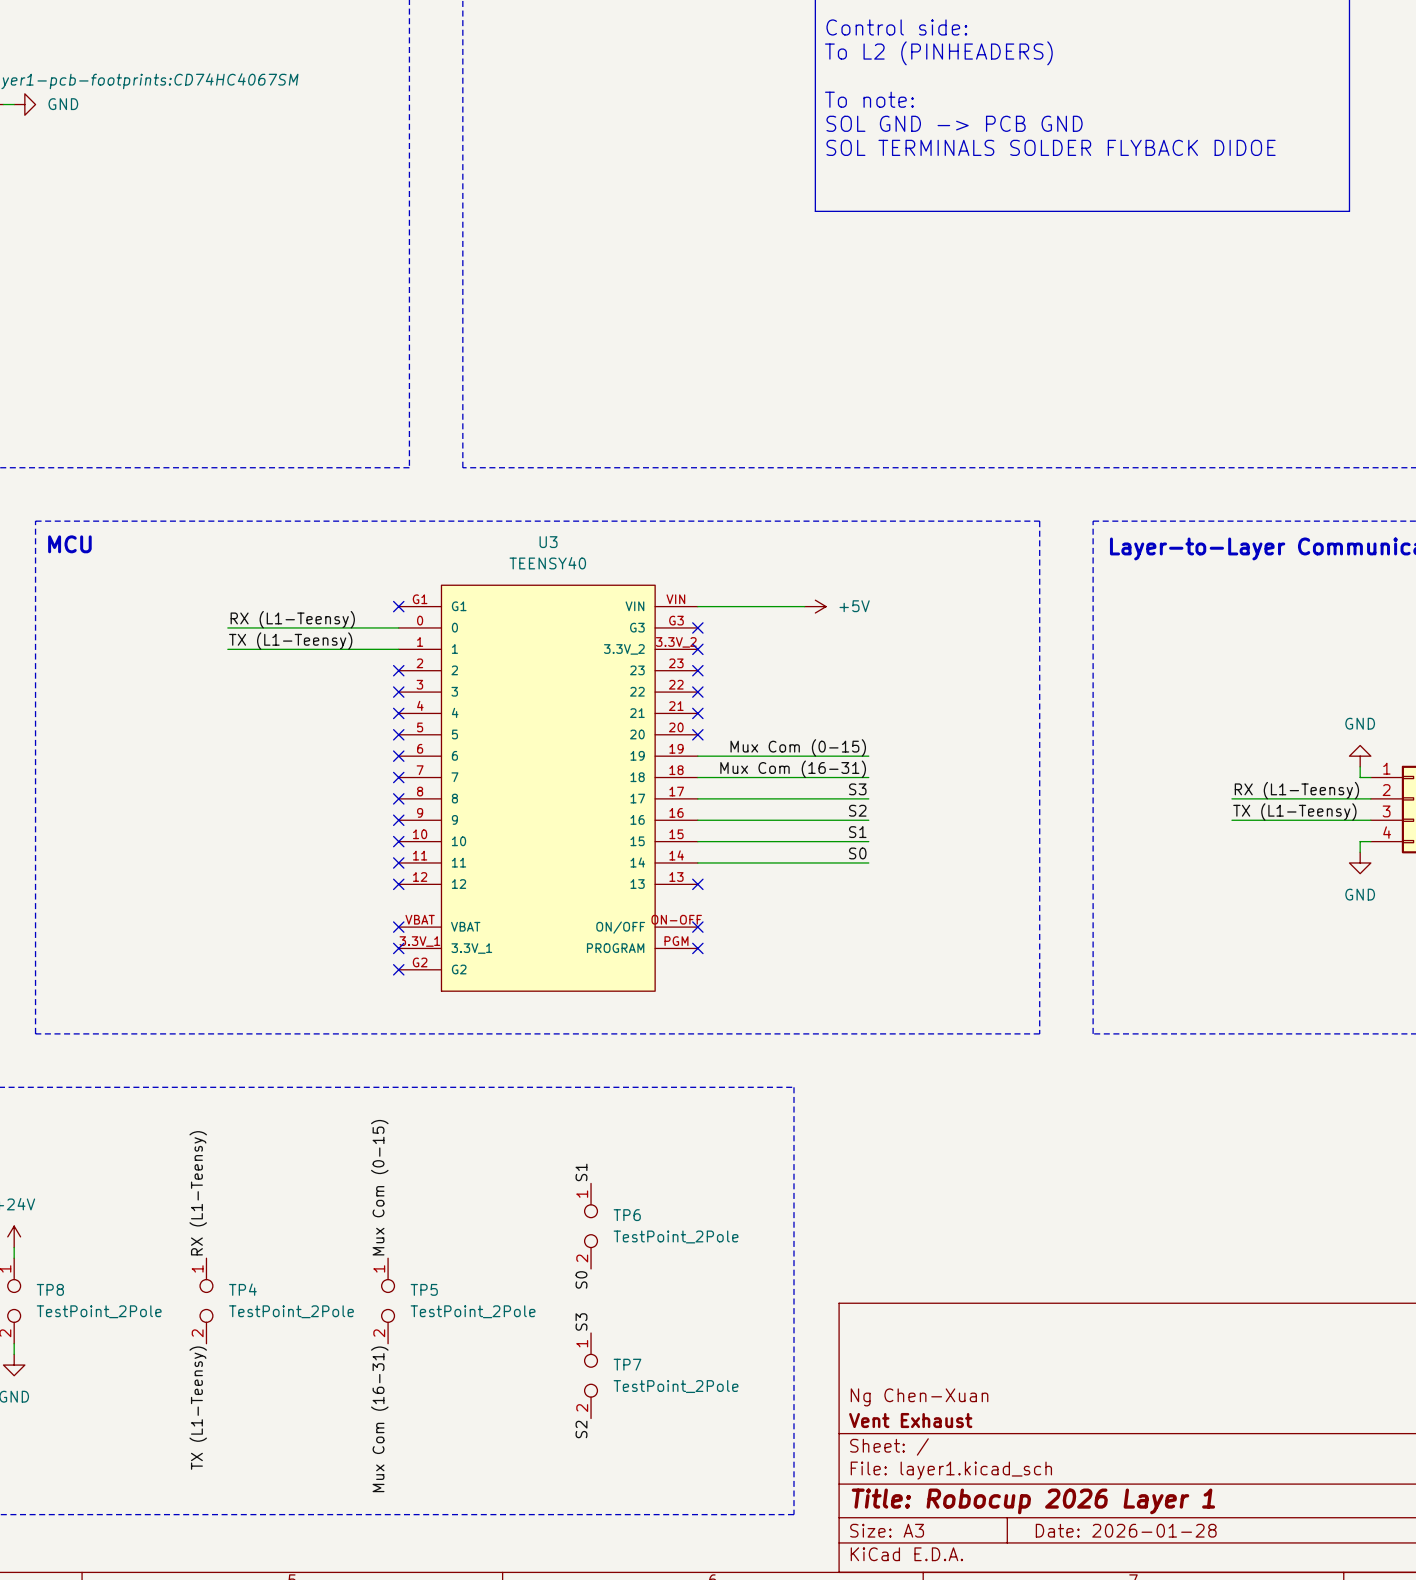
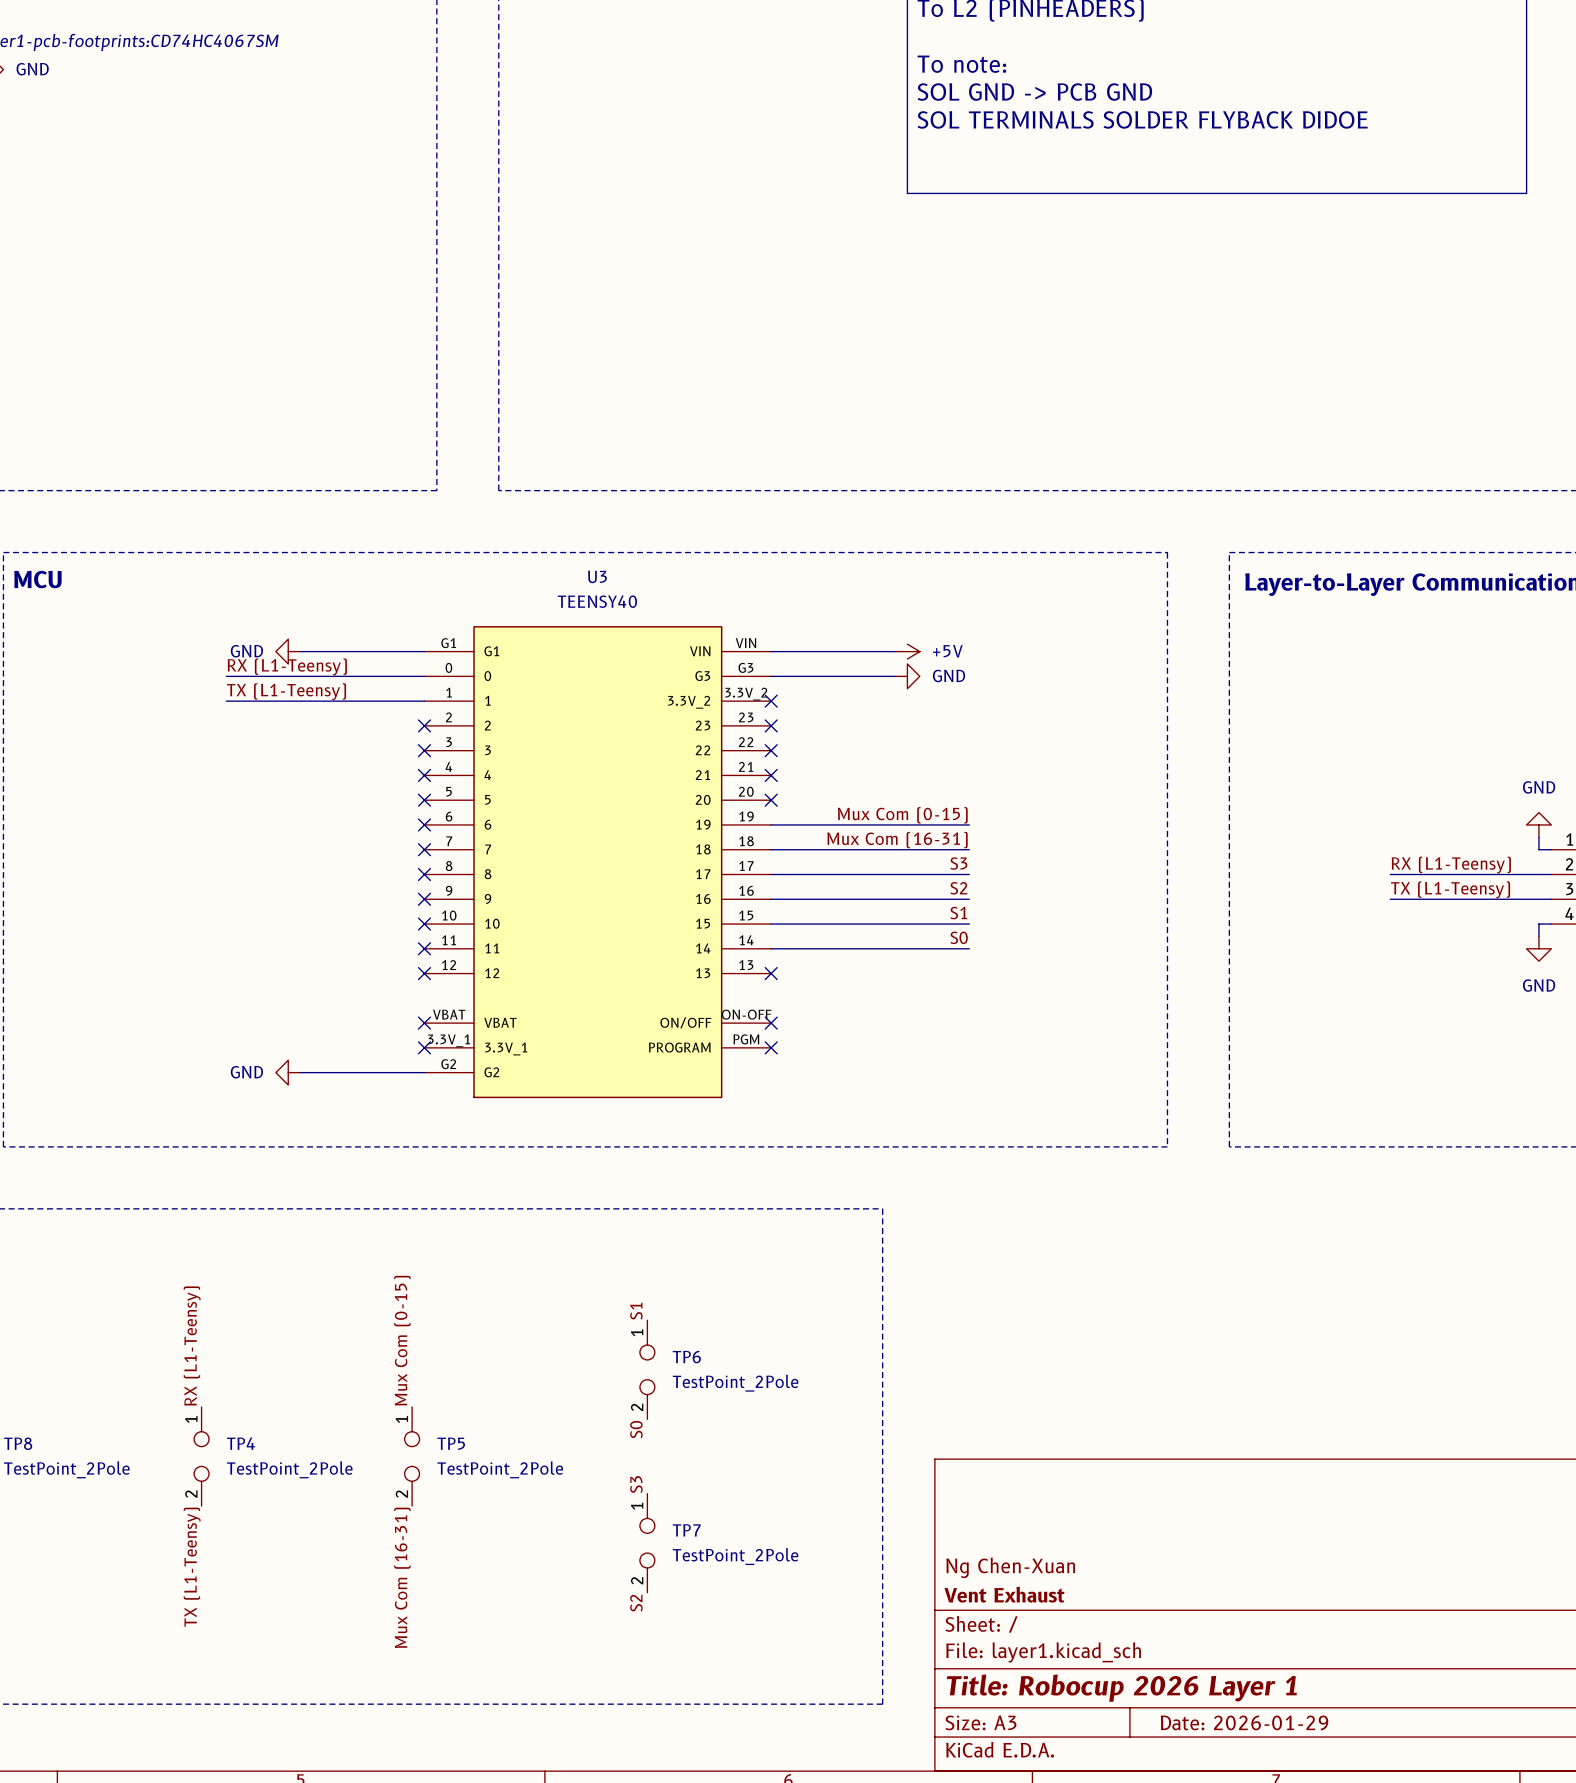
power symbol: none -> GND (288, 651)
wire: none -> (300, 651) (424, 651)
no-connect mark: (398, 606) -> none
wire: none -> (771, 676) (895, 676)
no-connect mark: (697, 627) -> none
power symbol: none -> GND (907, 676)
power symbol: none -> GND (288, 1072)
wire: none -> (300, 1072) (424, 1072)
no-connect mark: (398, 969) -> none
title block: Date: 2026-01-28 (1126, 1530) -> Date: 2026-01-29 (1244, 1722)

